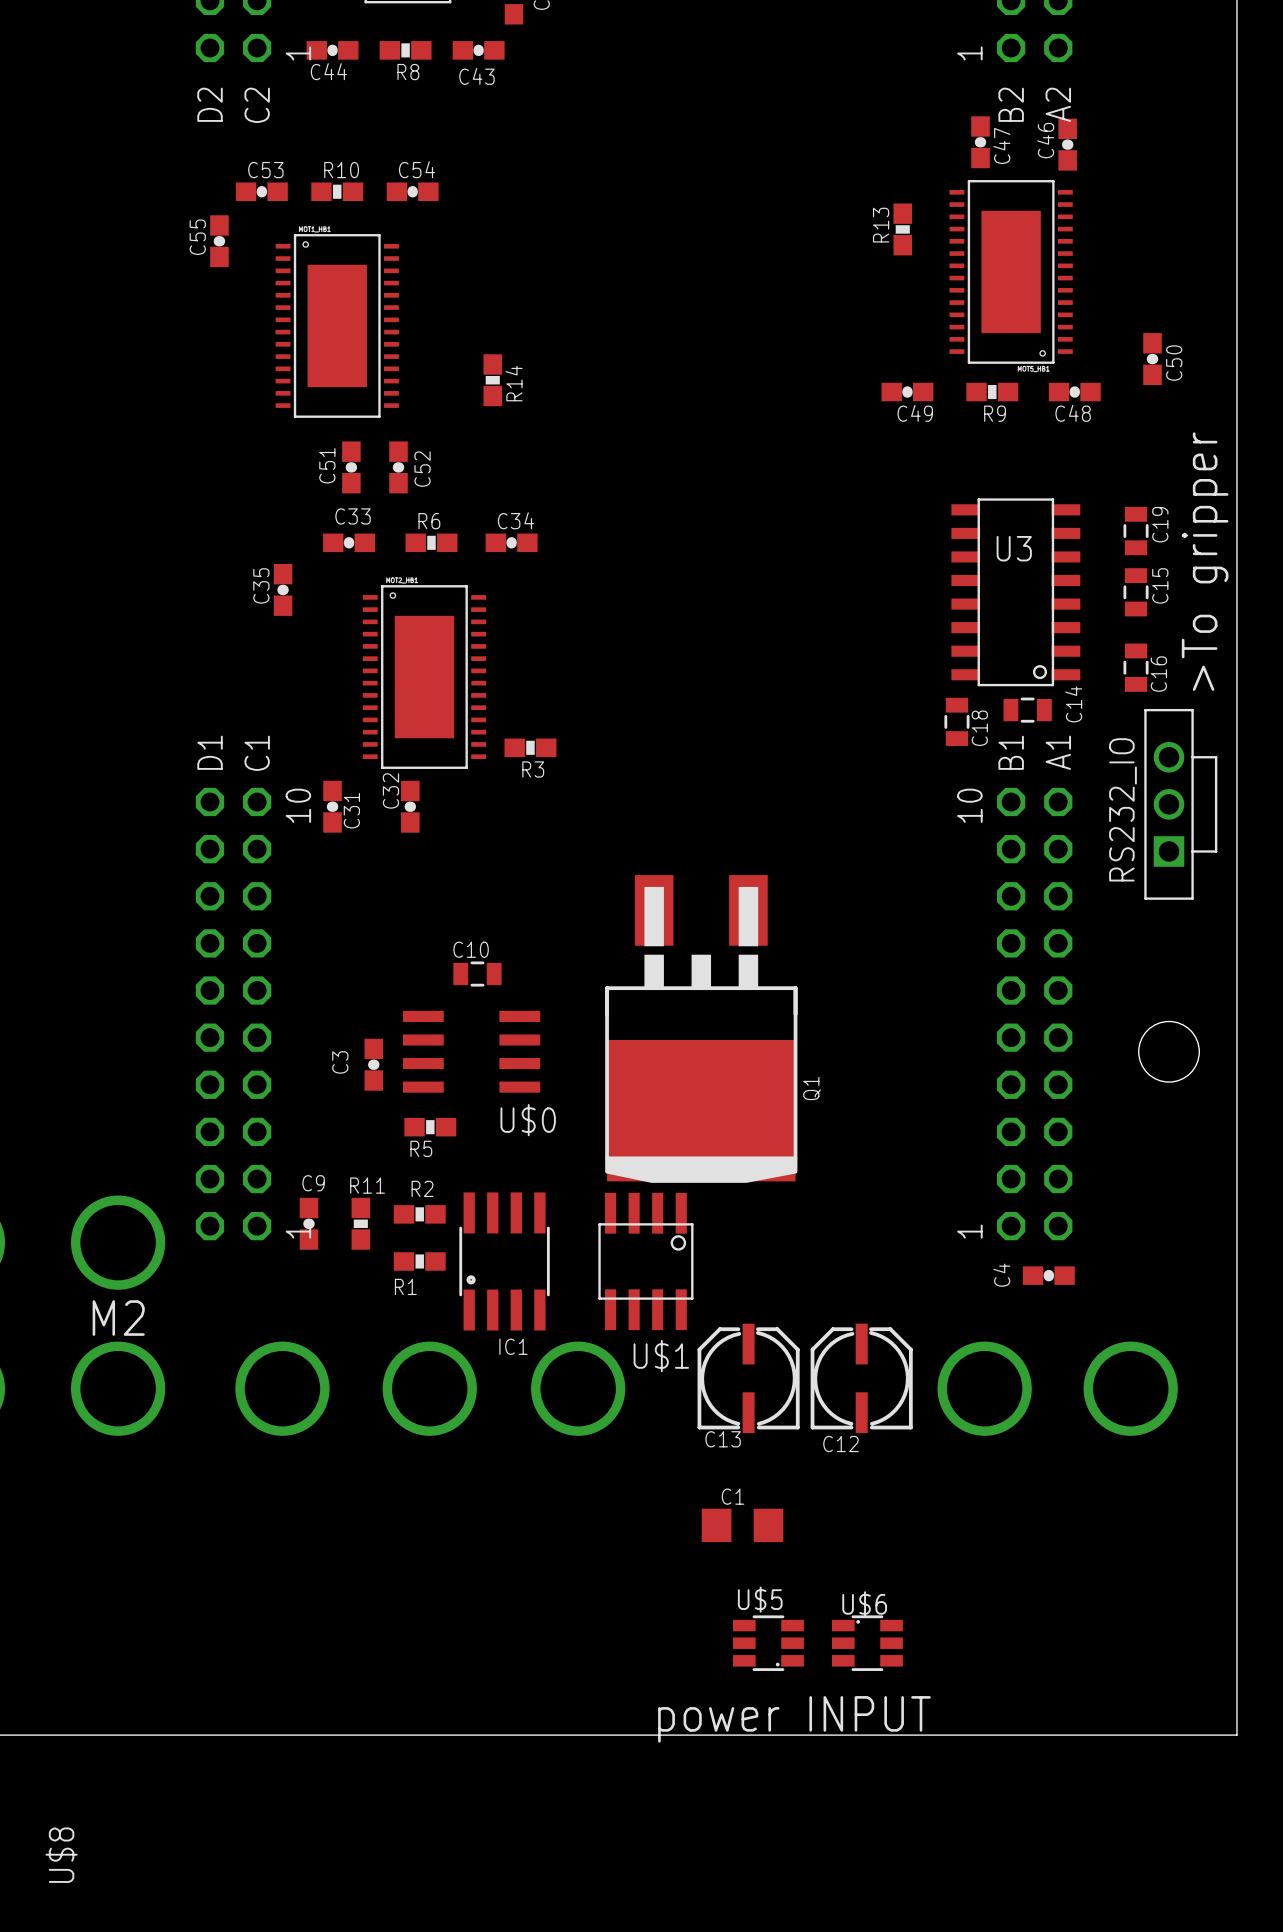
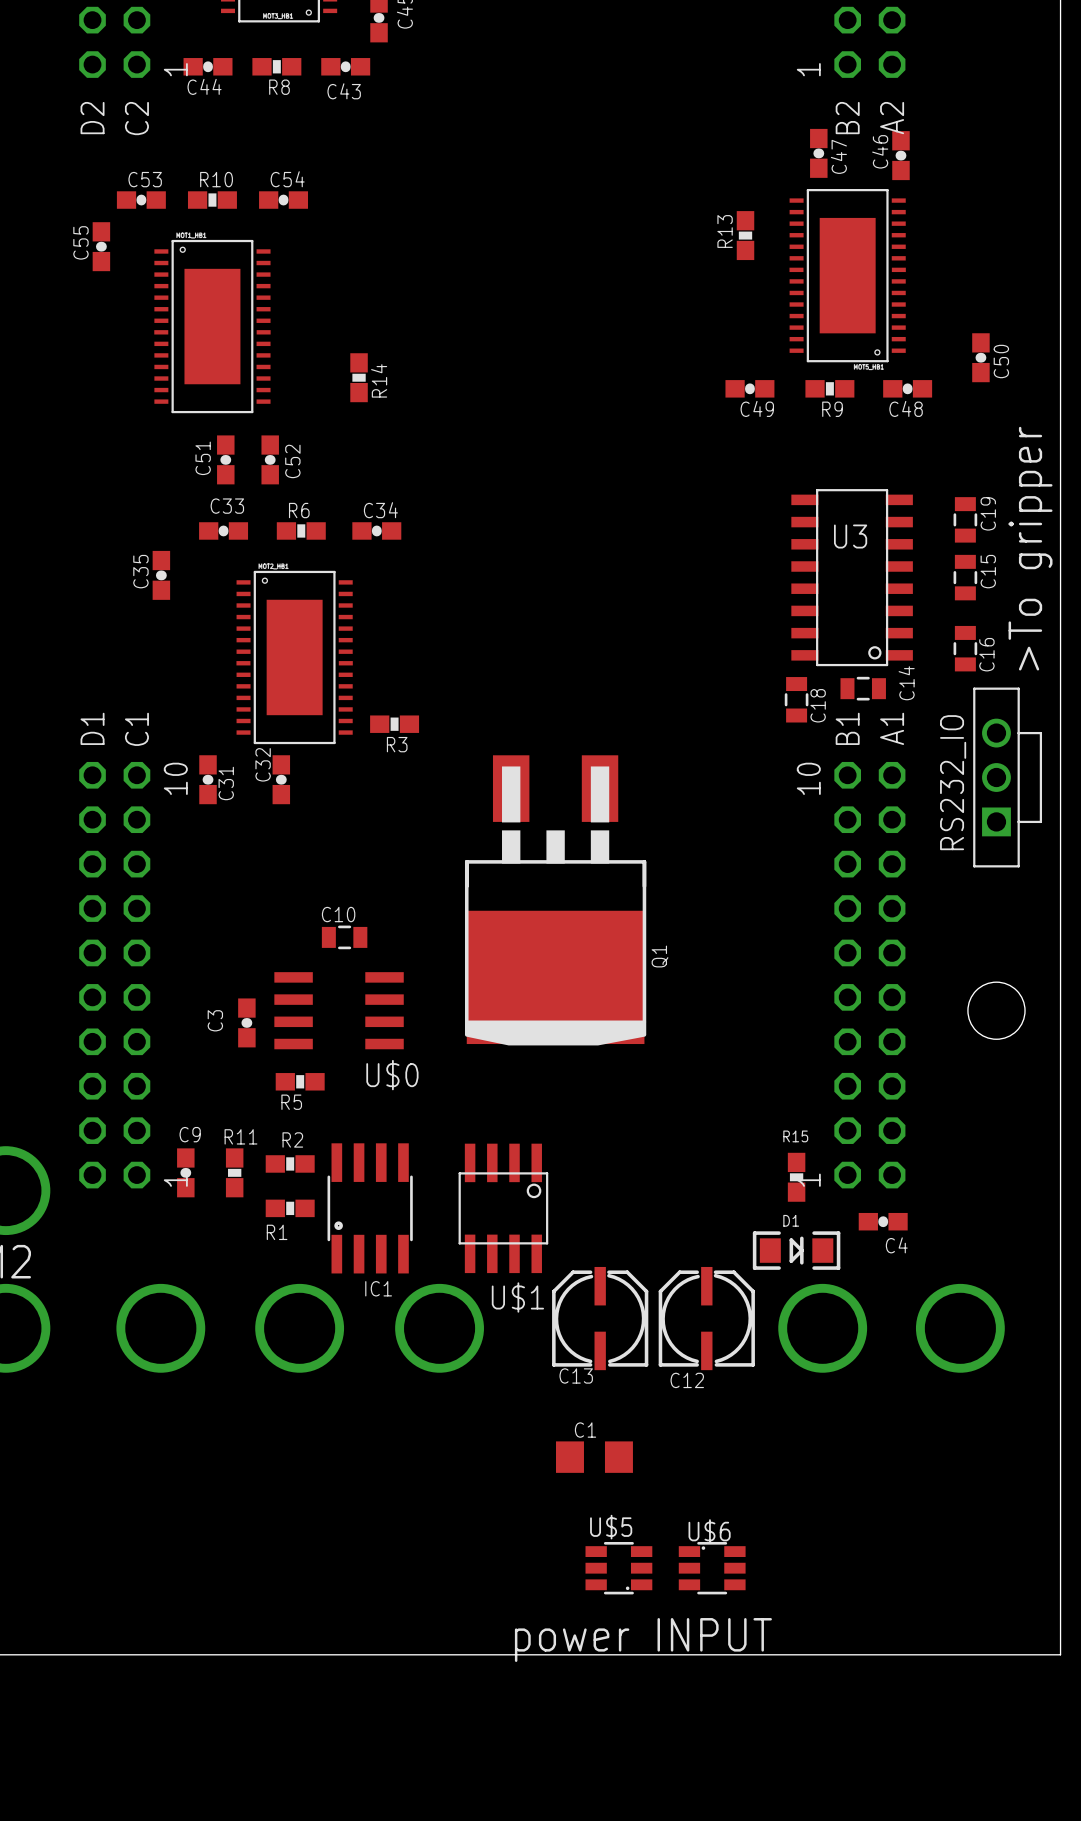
Q1 position: (701, 1028) -> (555, 900)
R15: none -> (796, 1177)
C4 name rotation: 0° (1001, 1275) -> 90° clockwise (896, 1245)
C4 name position: C4 (1001, 1275) -> C4 (896, 1245)
D1: none -> (796, 1250)

